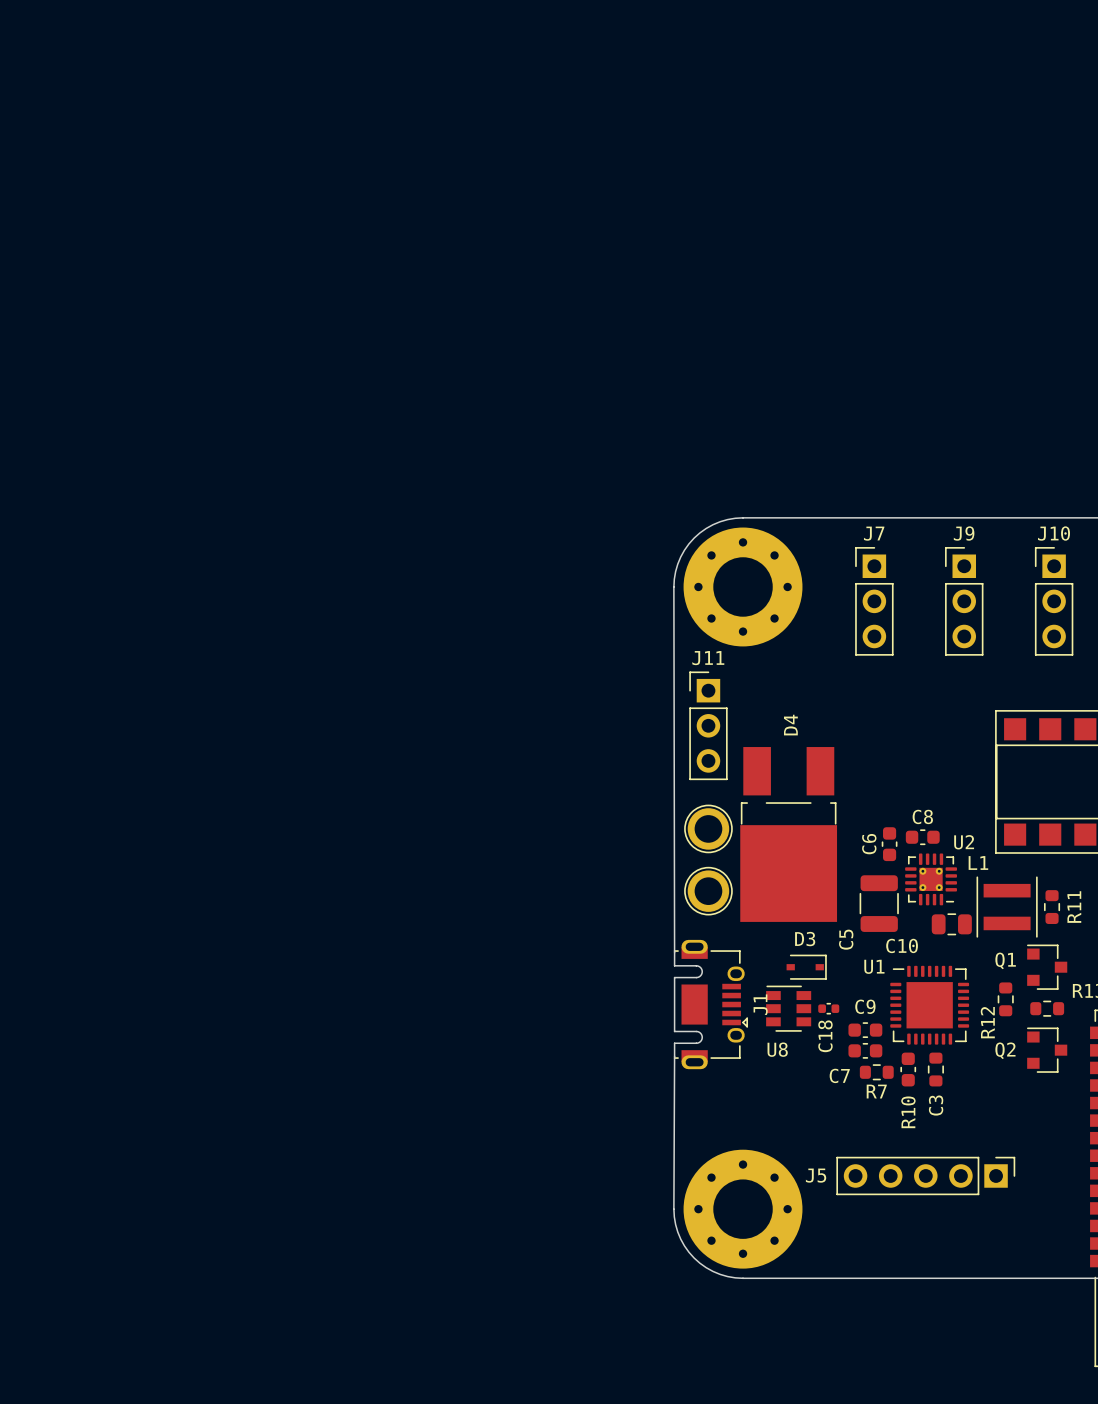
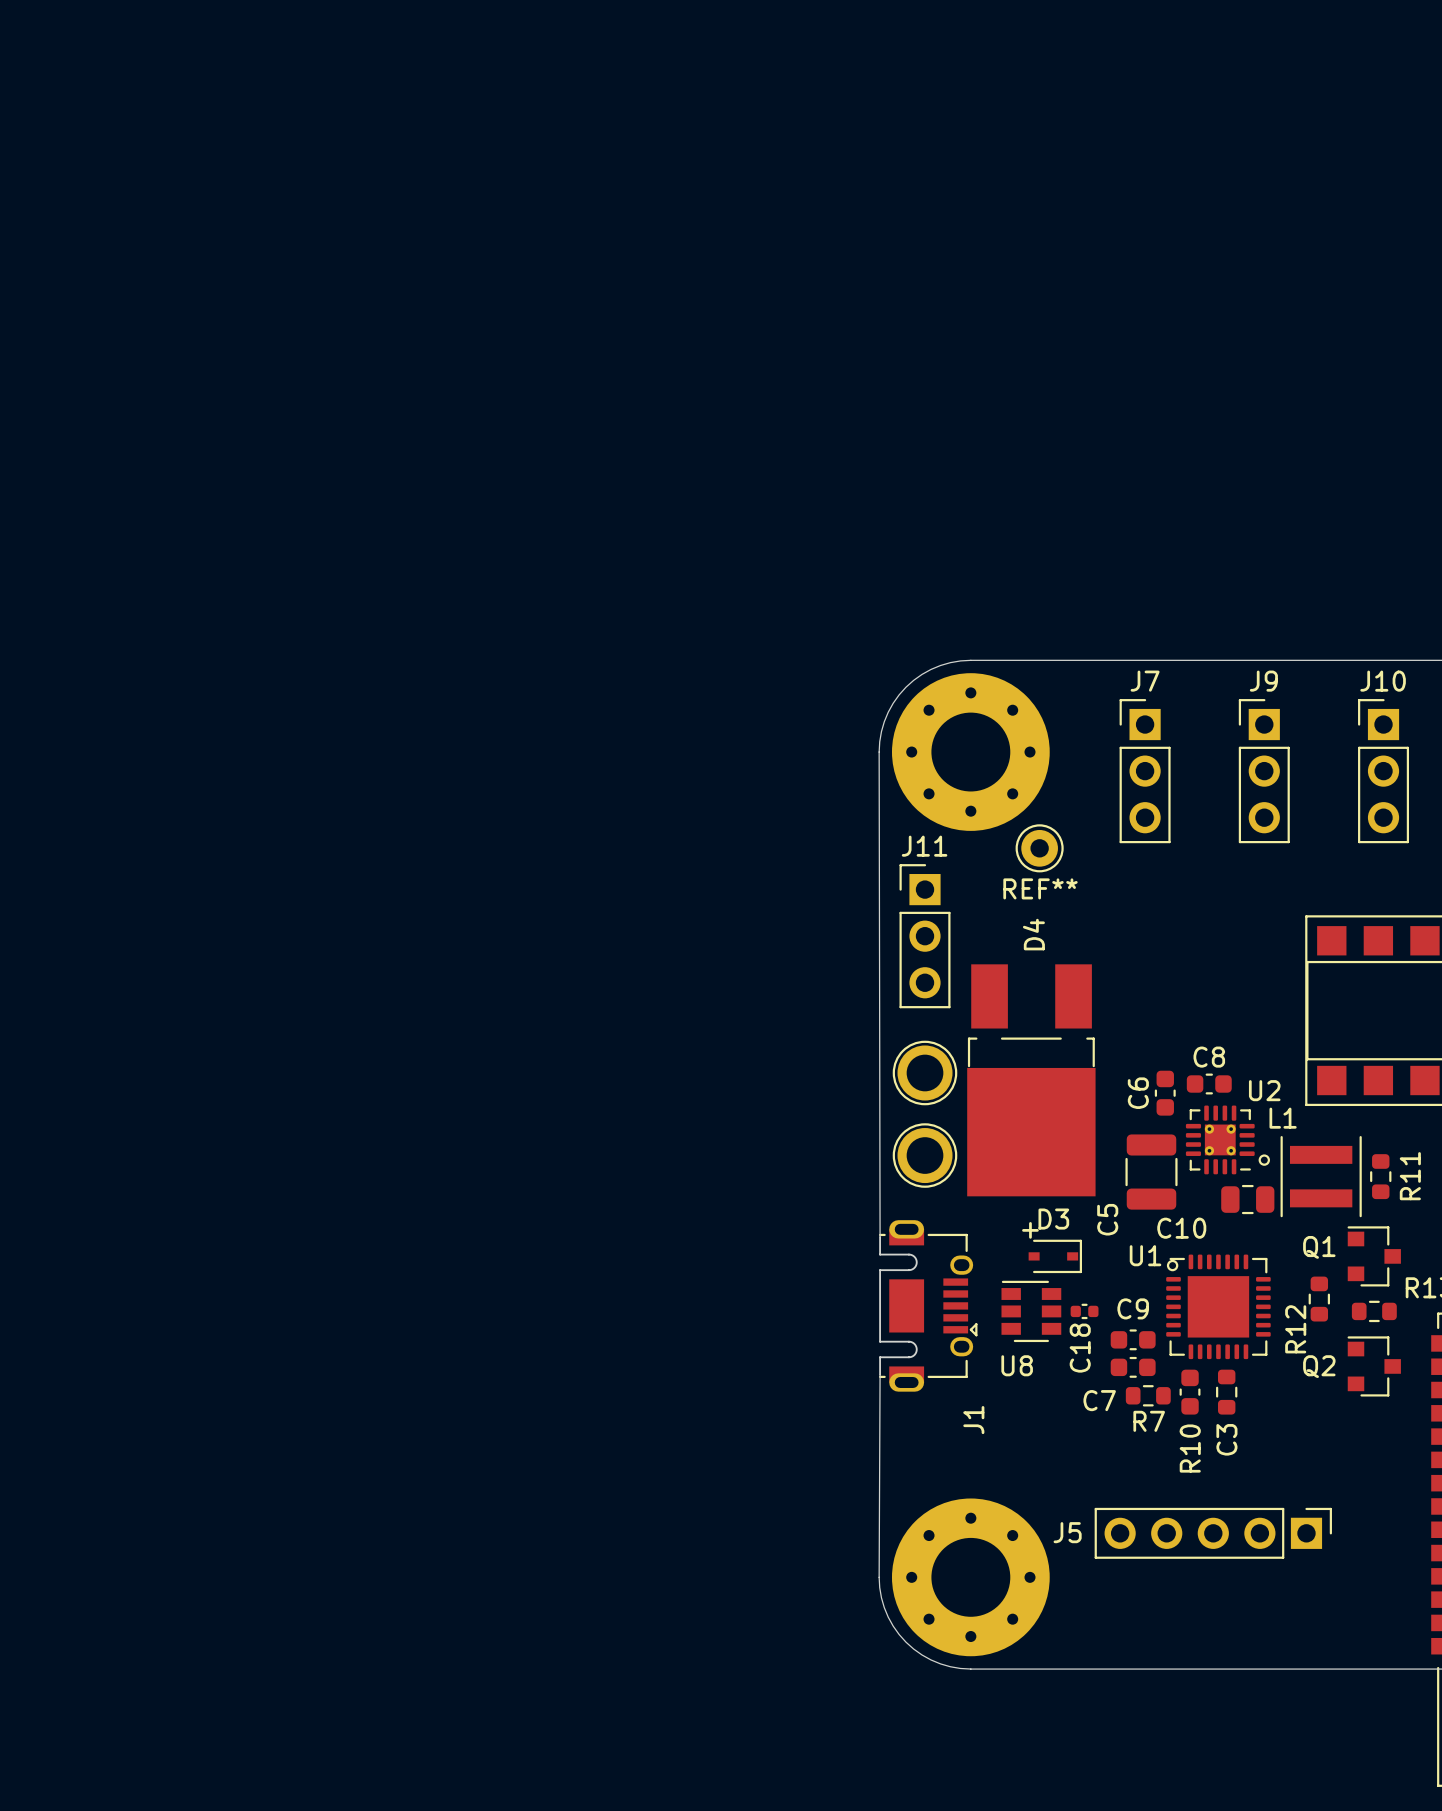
REF**: none -> (1039, 848)
drawing: none -> [1258, 1154, 1270, 1166]
text: none -> + (1030, 1230)
drawing: none -> [1166, 1259, 1179, 1272]
J1 name position: J1 (760, 1004) -> J1 (973, 1420)

